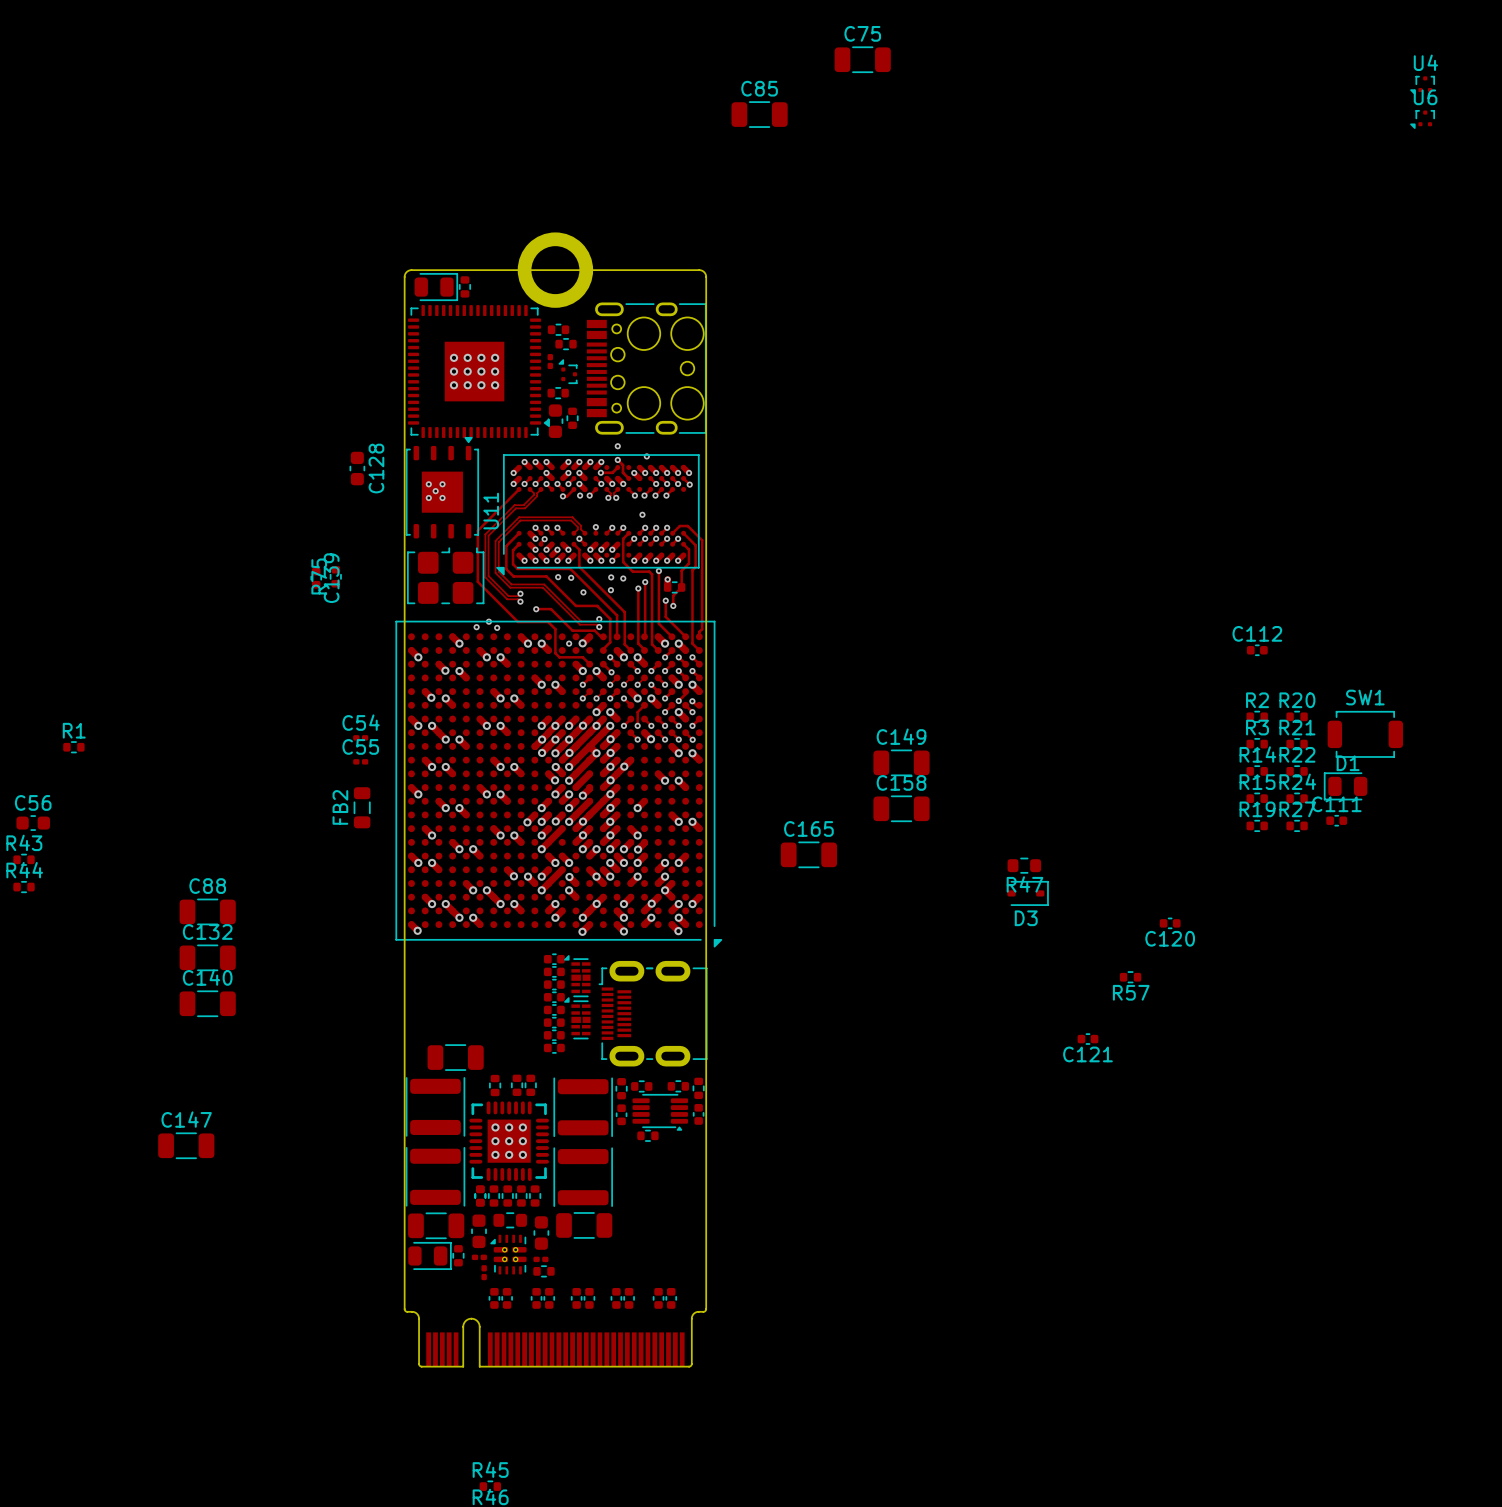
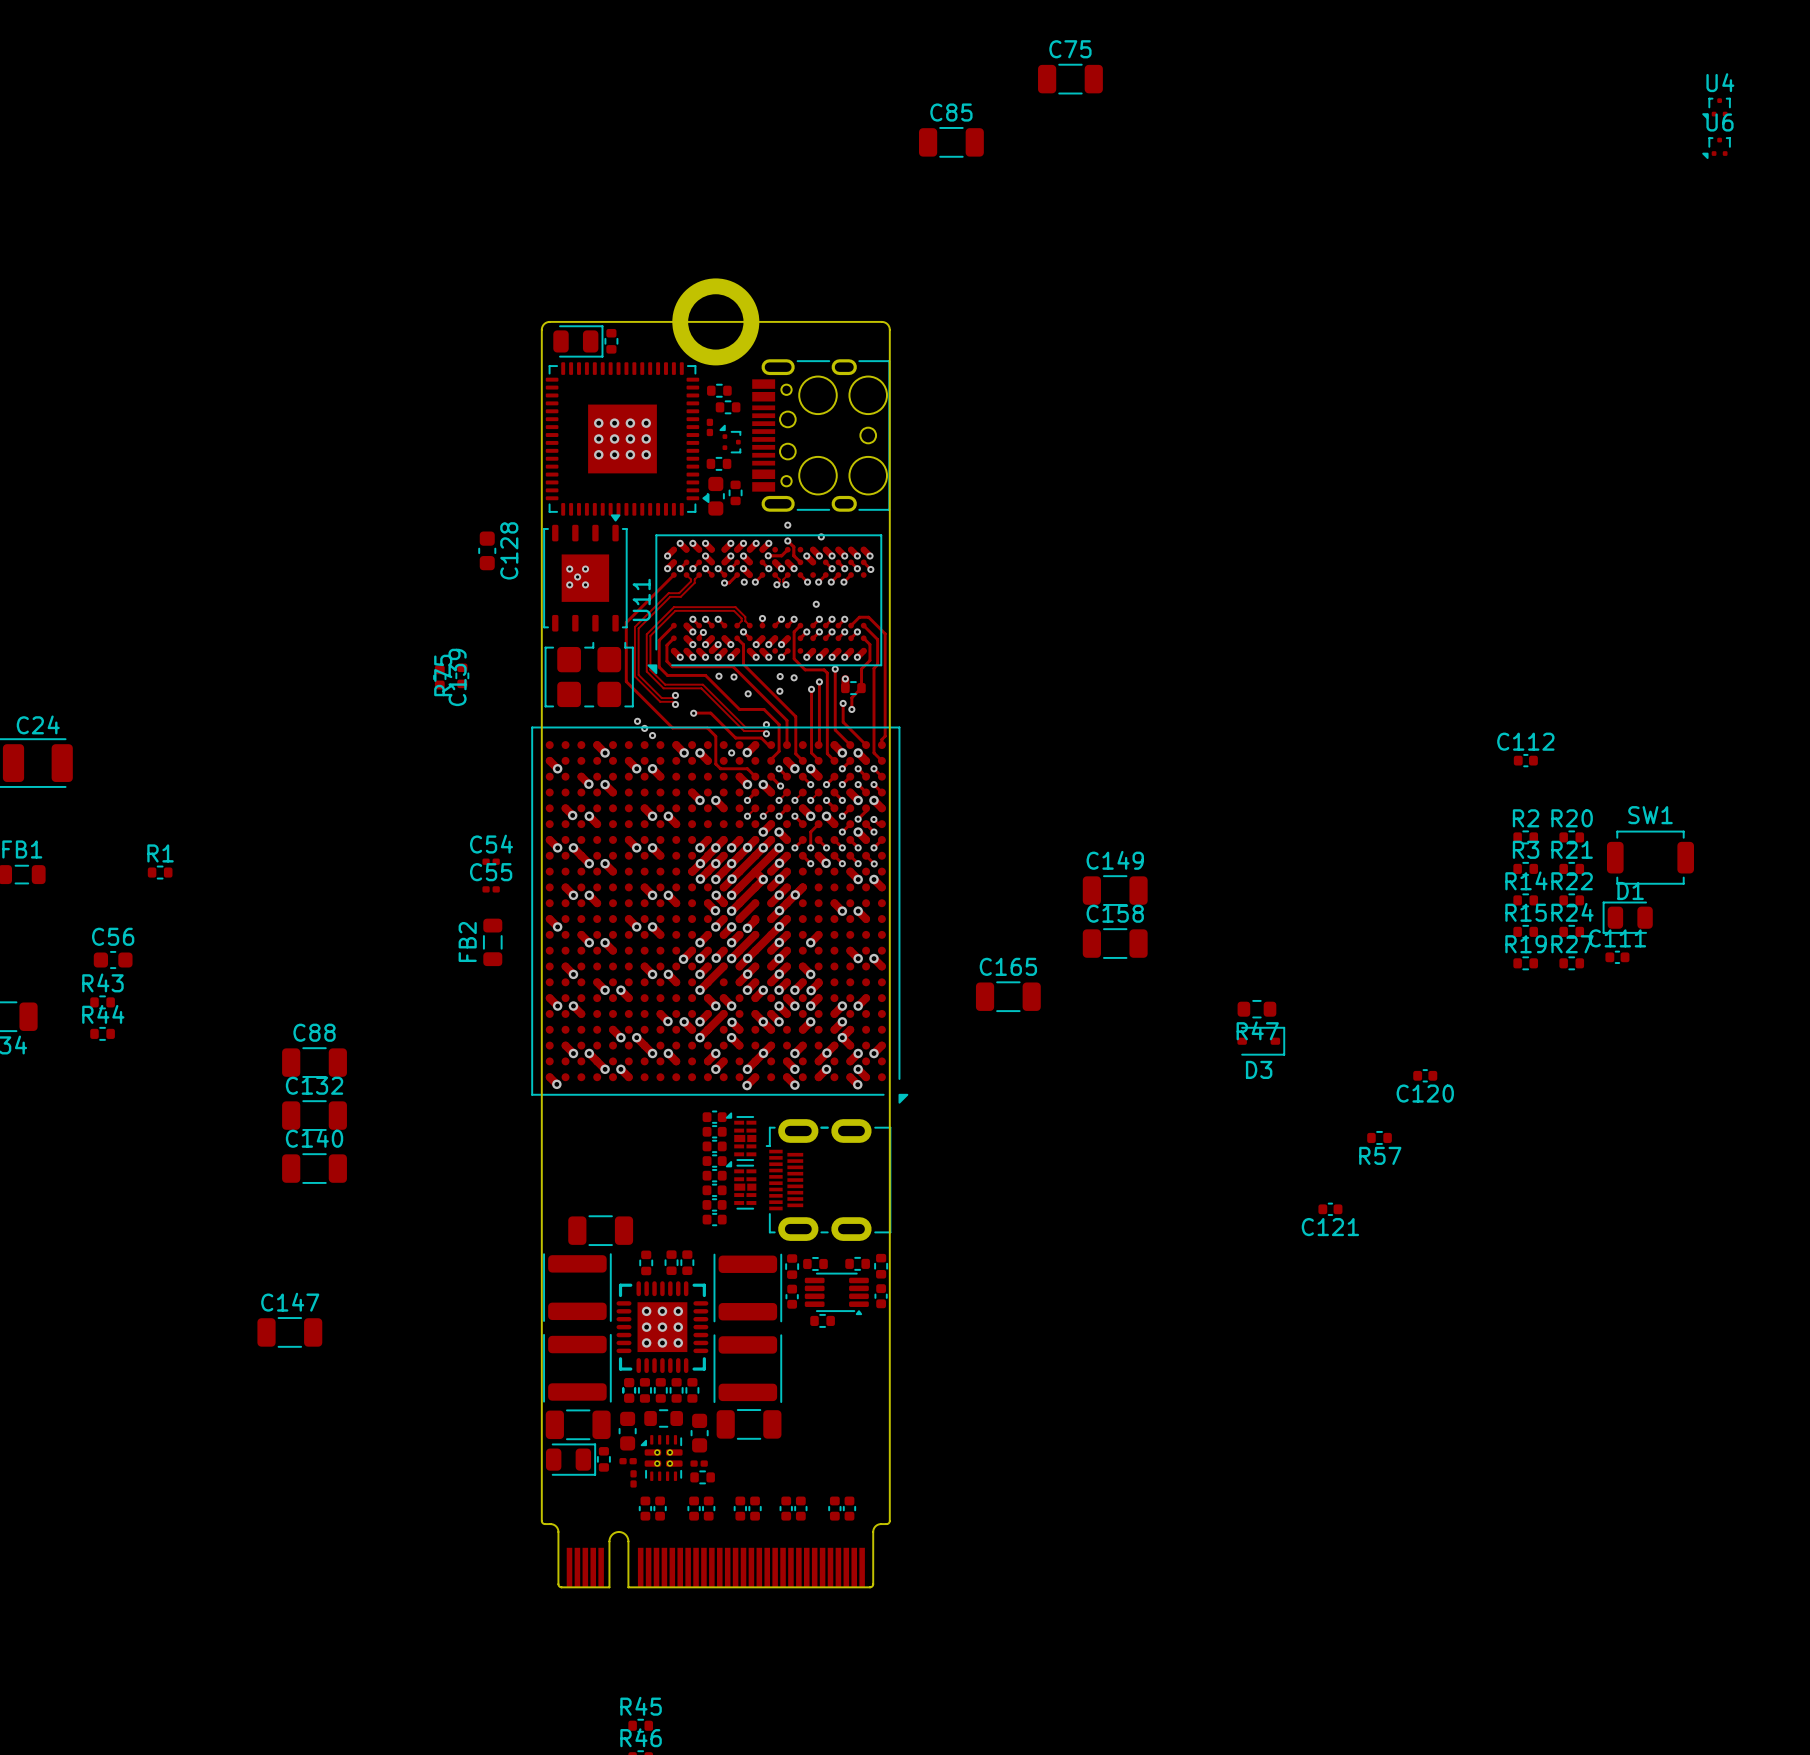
via: none -> (637, 721)
via: (488, 621) -> none
via: none -> (644, 728)
via: (476, 627) -> none
via: (497, 627) -> none
via: none -> (652, 735)

